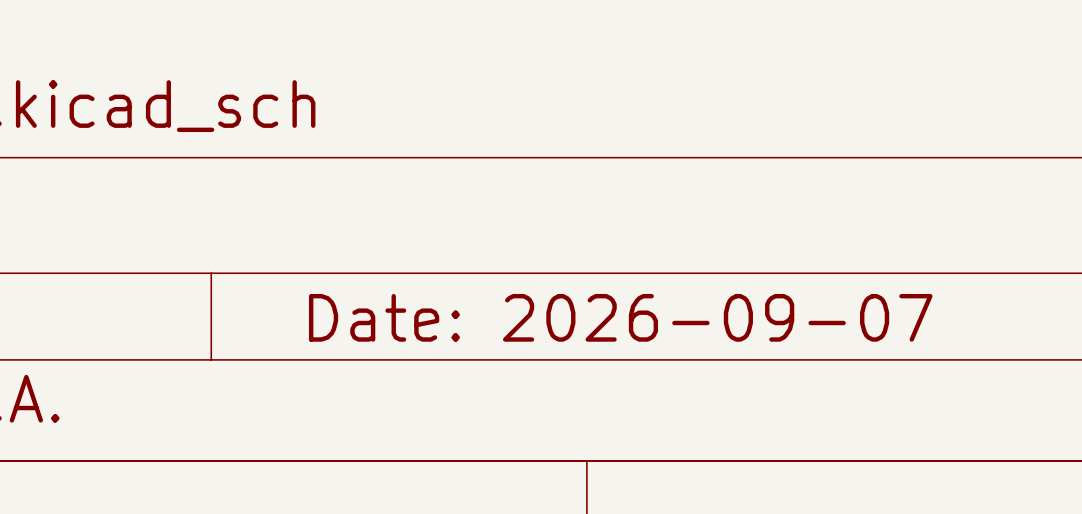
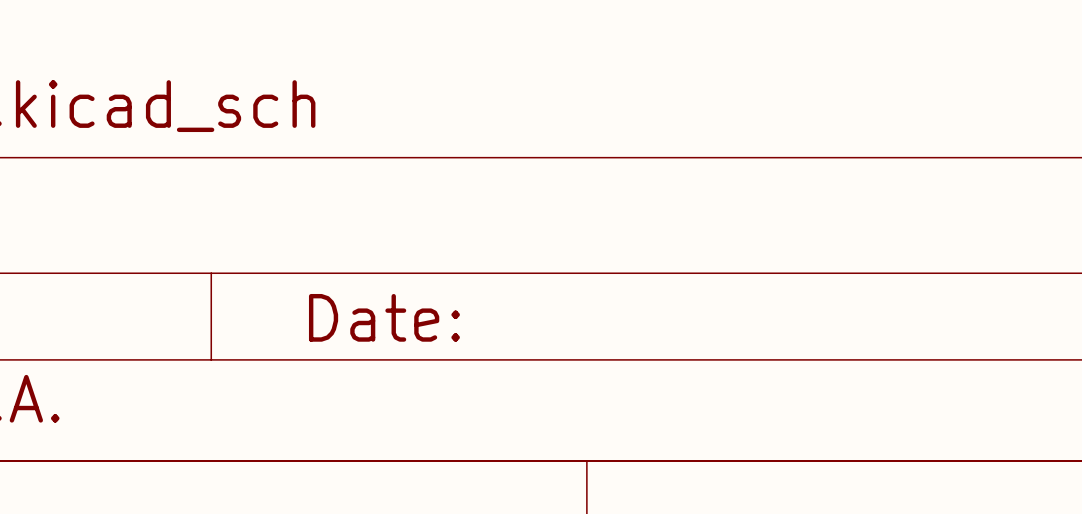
title block: Date: 2026-09-07 (620, 317) -> Date: (384, 317)

